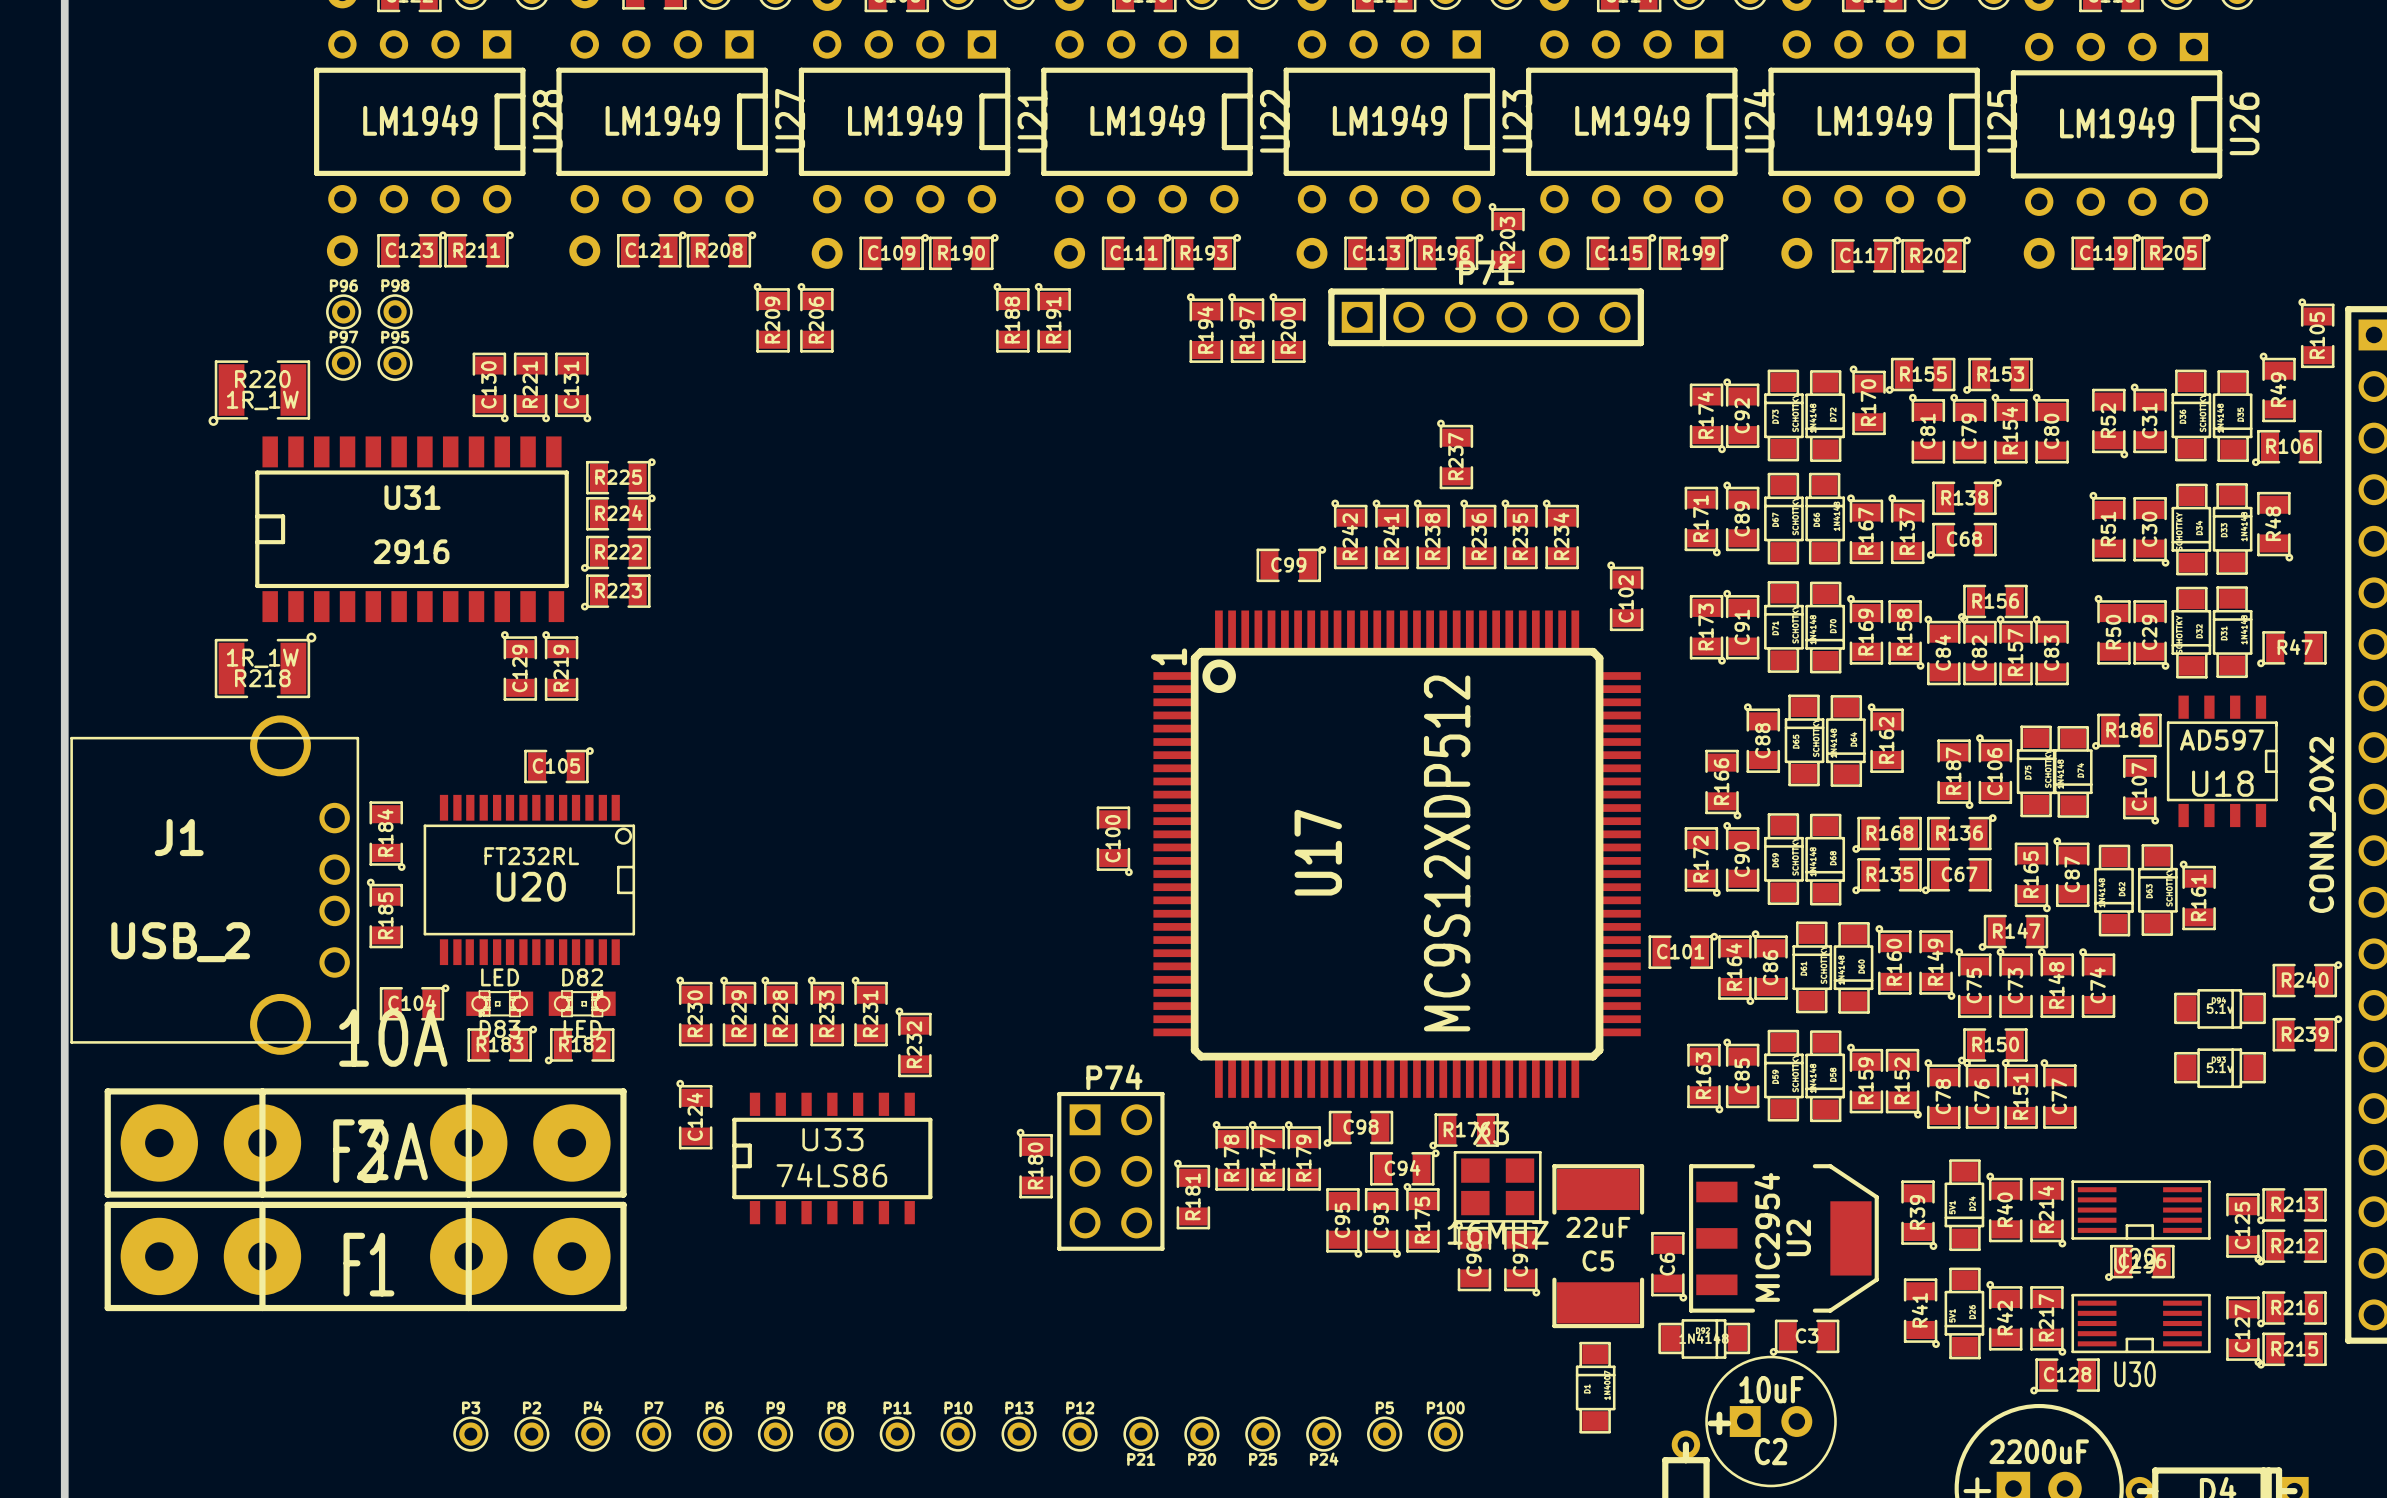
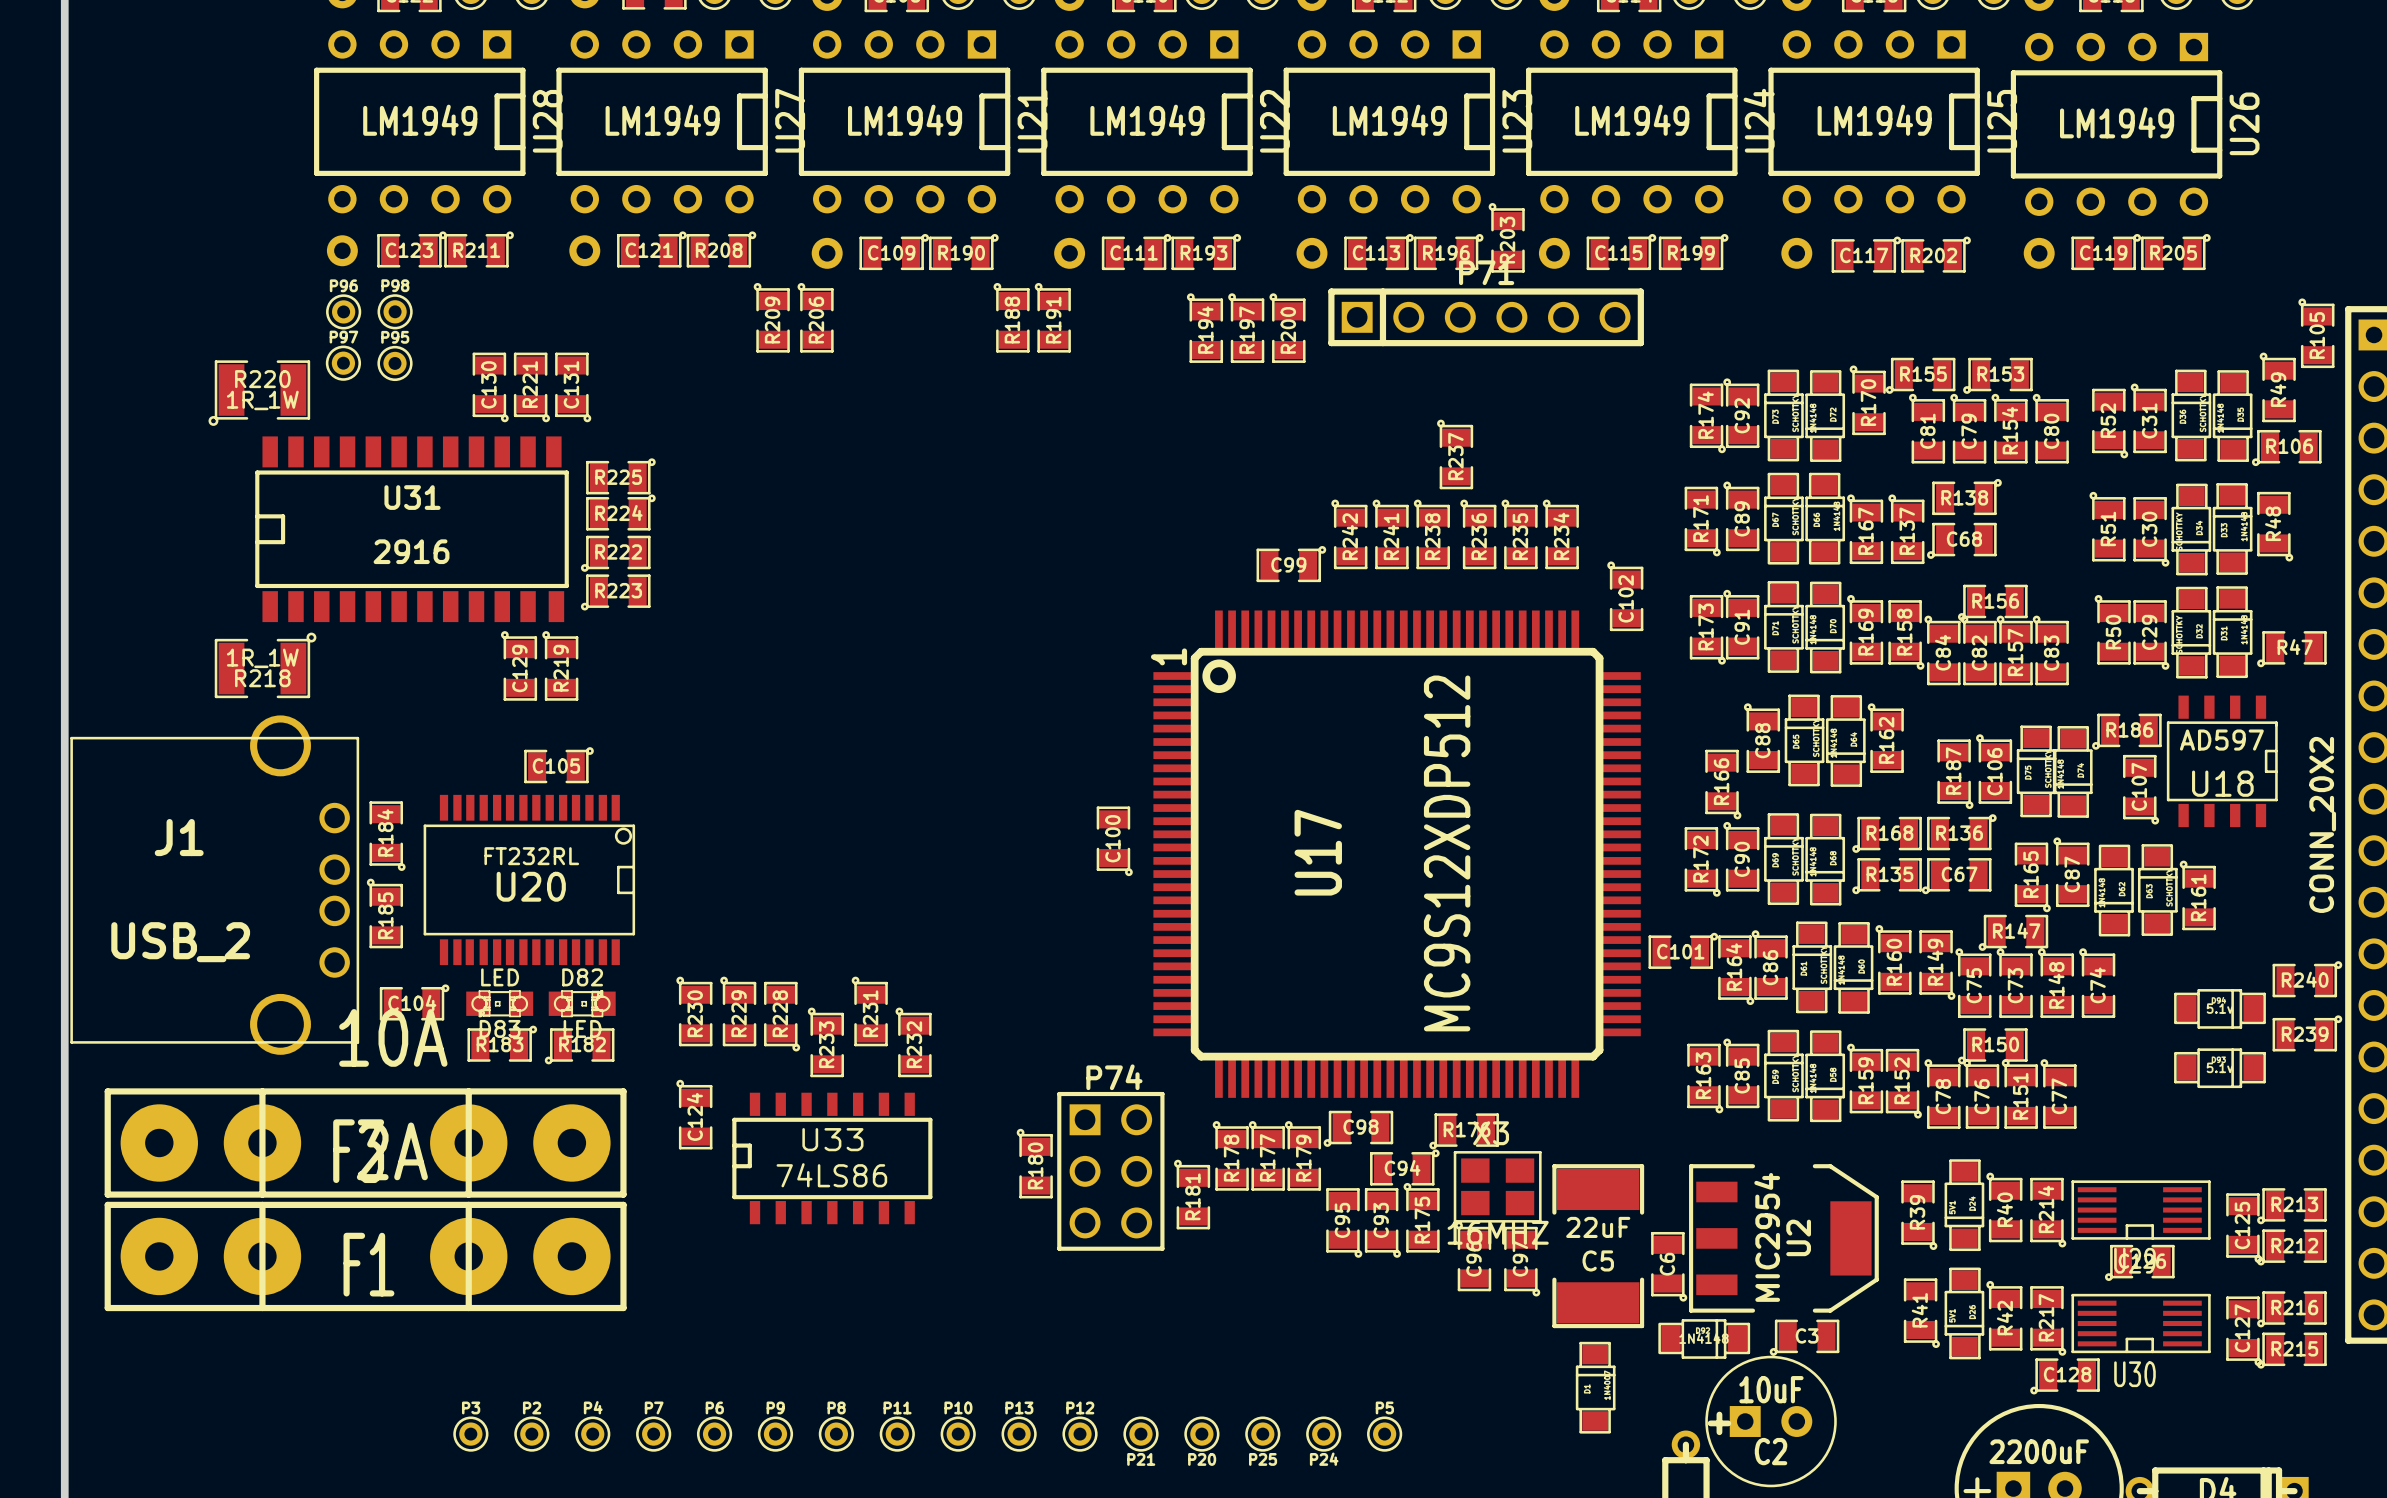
R228 rotation: 0° (779, 1011) -> 180° (782, 1016)
R233 position: (825, 1011) -> (825, 1042)
P100: (1445, 1434) -> none

